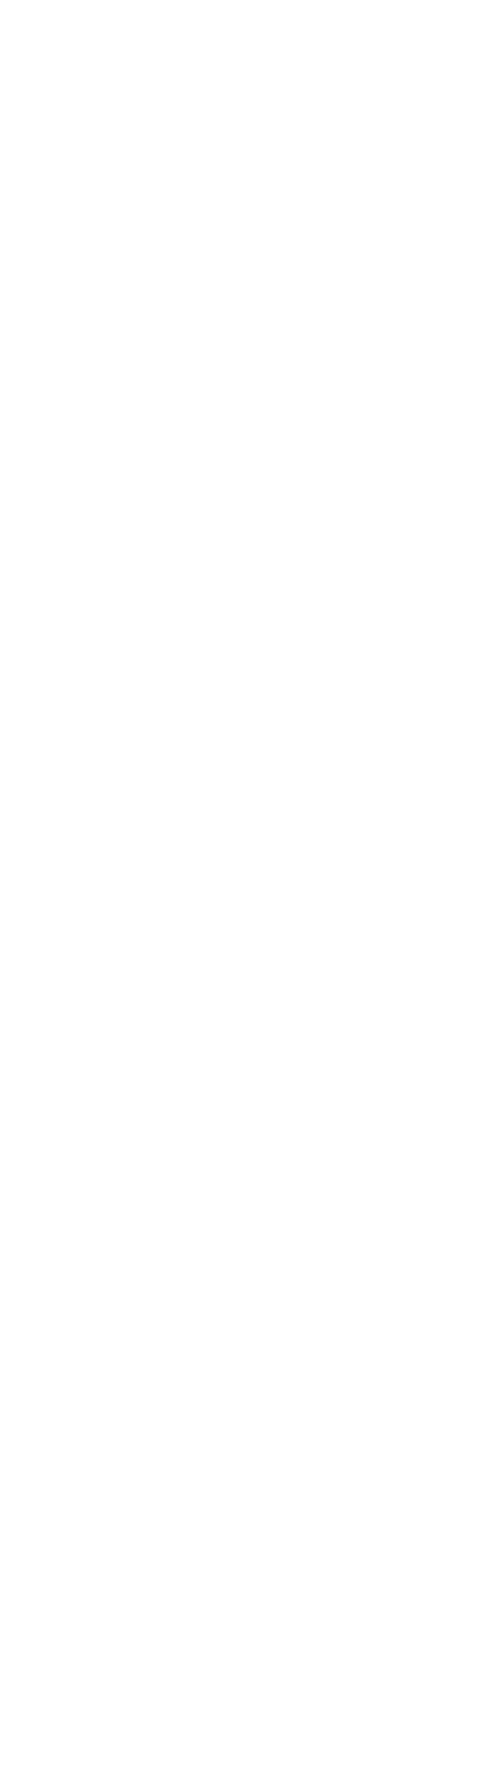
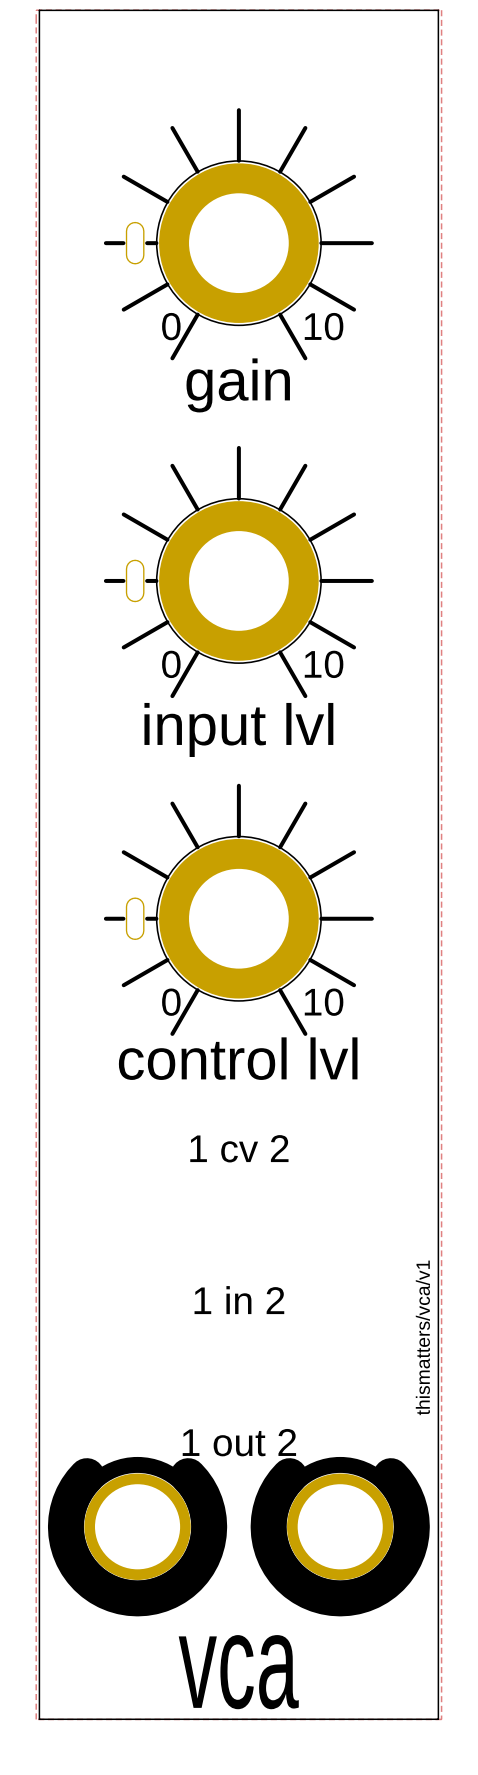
zone outline: none -> (36, 10) (441, 10) (441, 1719) (36, 1719) (36, 10)
board edge: none -> (39, 10) (438, 10) (438, 1719) (39, 1719) (39, 10)
part: none -> (238, 234)
text: none -> gain (238, 385)
part: none -> (238, 572)
text: none -> input lvl (238, 729)
part: none -> (238, 909)
text: none -> control lvl (238, 1058)
text: none -> 1 cv 2 (239, 1148)
text: none -> 1 in 2 (239, 1300)
text: none -> thismatters/vca/v1 (422, 1337)
text: none -> 1 out 2 (239, 1442)
part: none -> (137, 1536)
part: none -> (340, 1536)
text: none -> vca (238, 1672)

